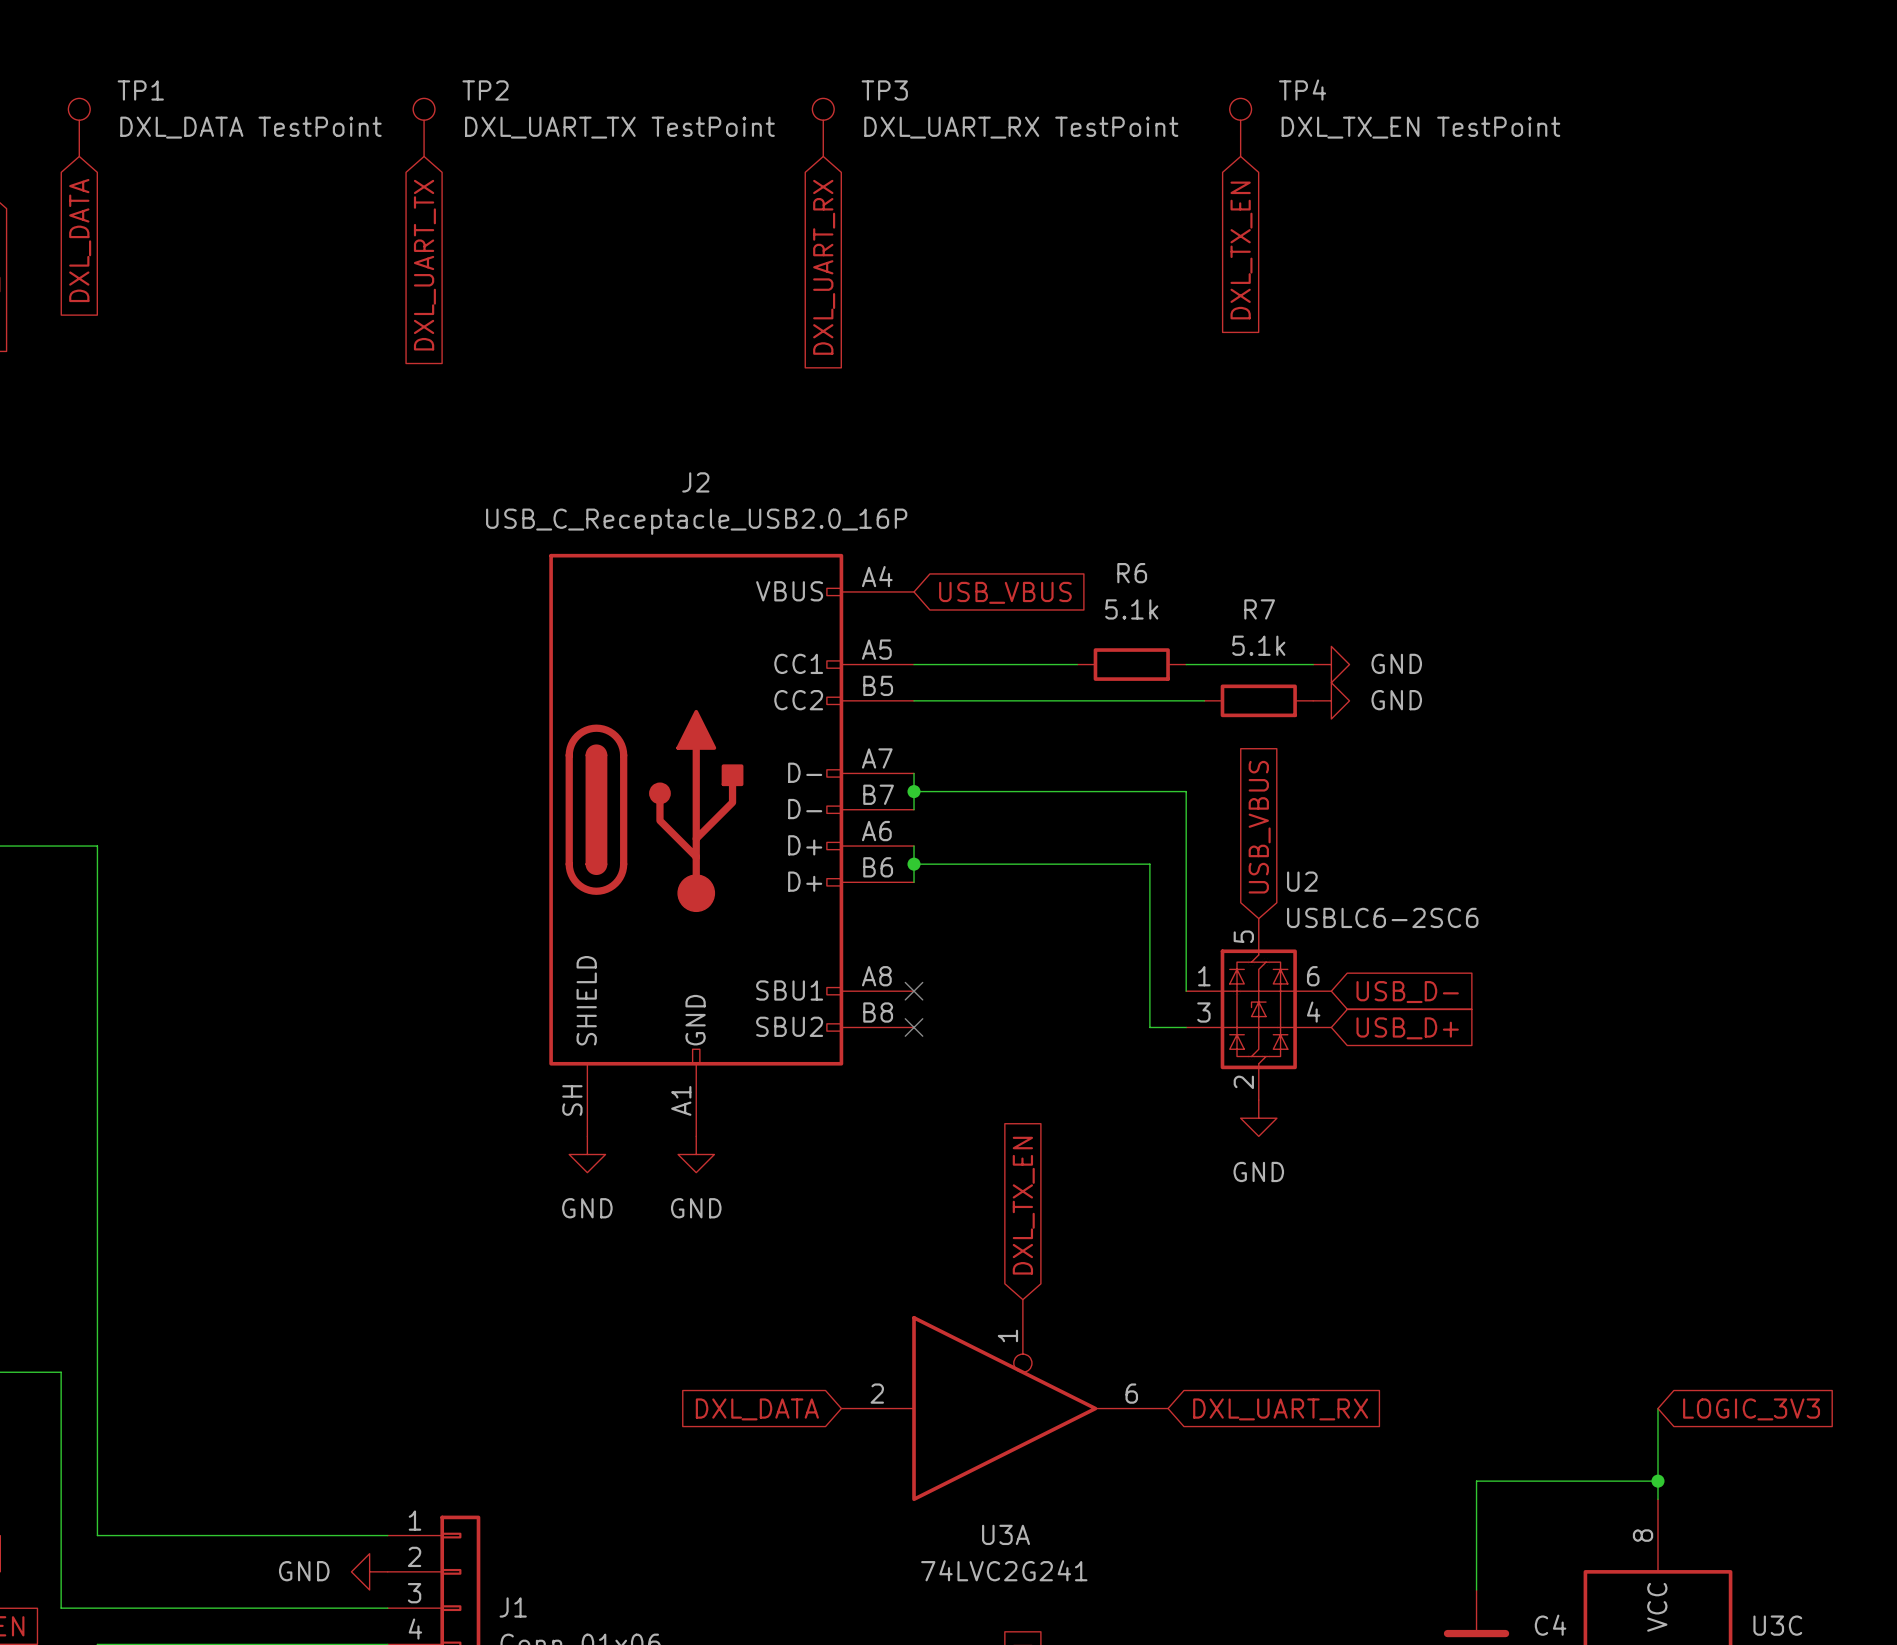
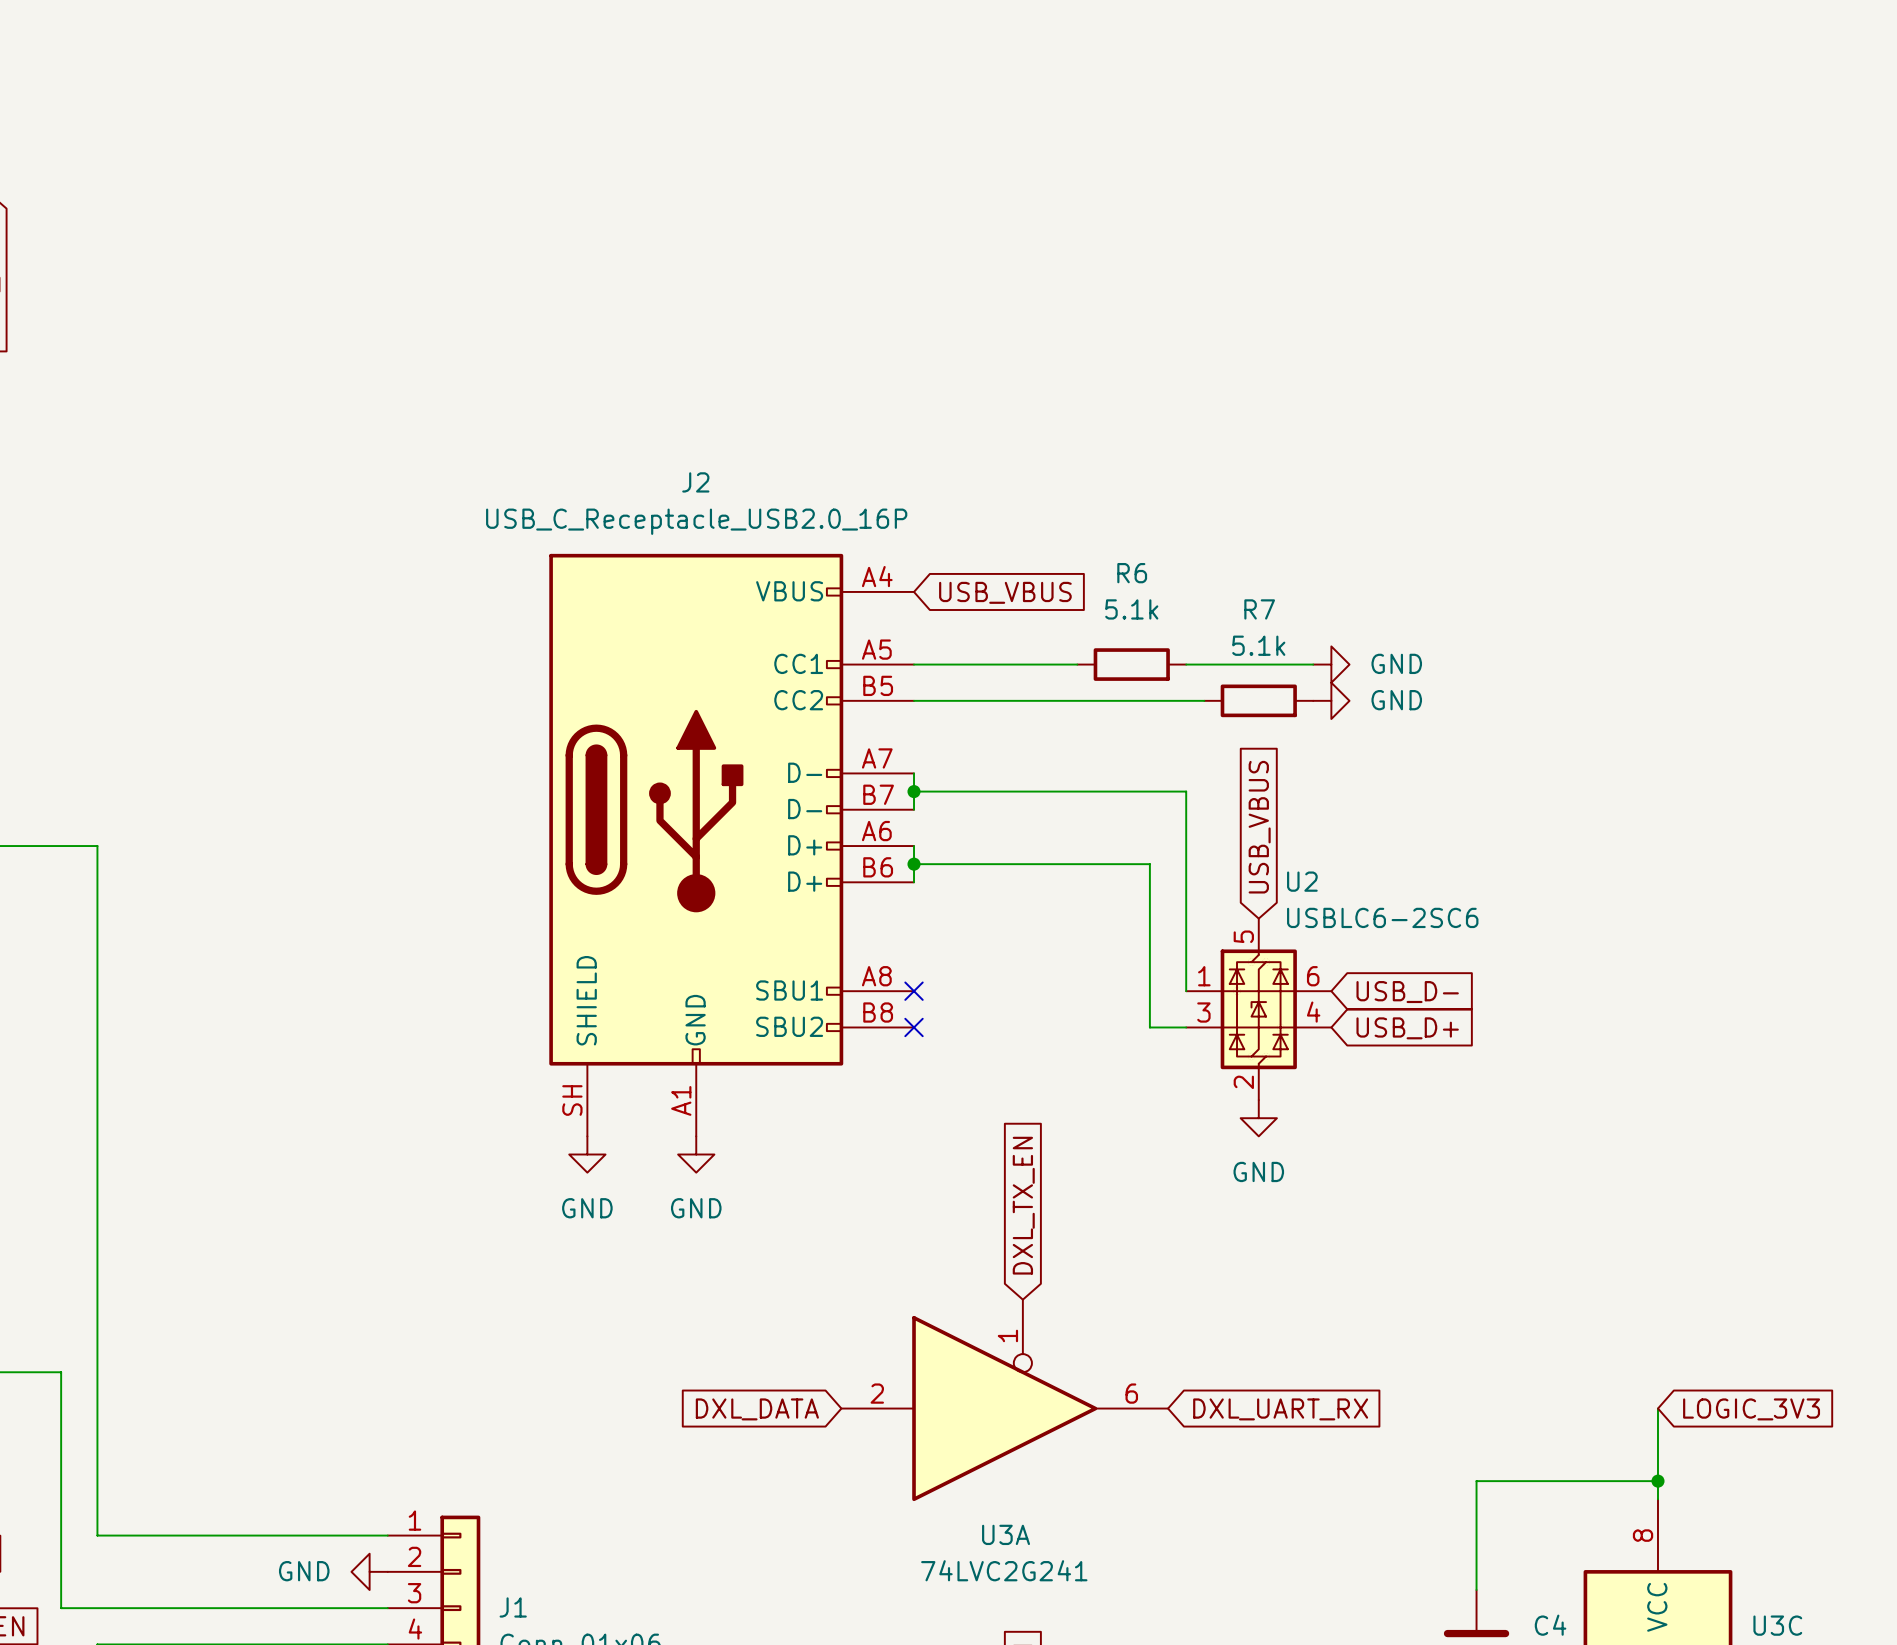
TP1: DXL_DATA TestPoint (79, 127) -> none
TP2: DXL_UART_TX TestPoint (424, 127) -> none
TP3: DXL_UART_RX TestPoint (823, 127) -> none
TP4: DXL_TX_EN TestPoint (1240, 127) -> none
global label: DXL_DATA (80, 240) -> none
global label: DXL_TX_EN (1241, 250) -> none
global label: DXL_UART_TX (424, 265) -> none
global label: DXL_UART_RX (824, 267) -> none

